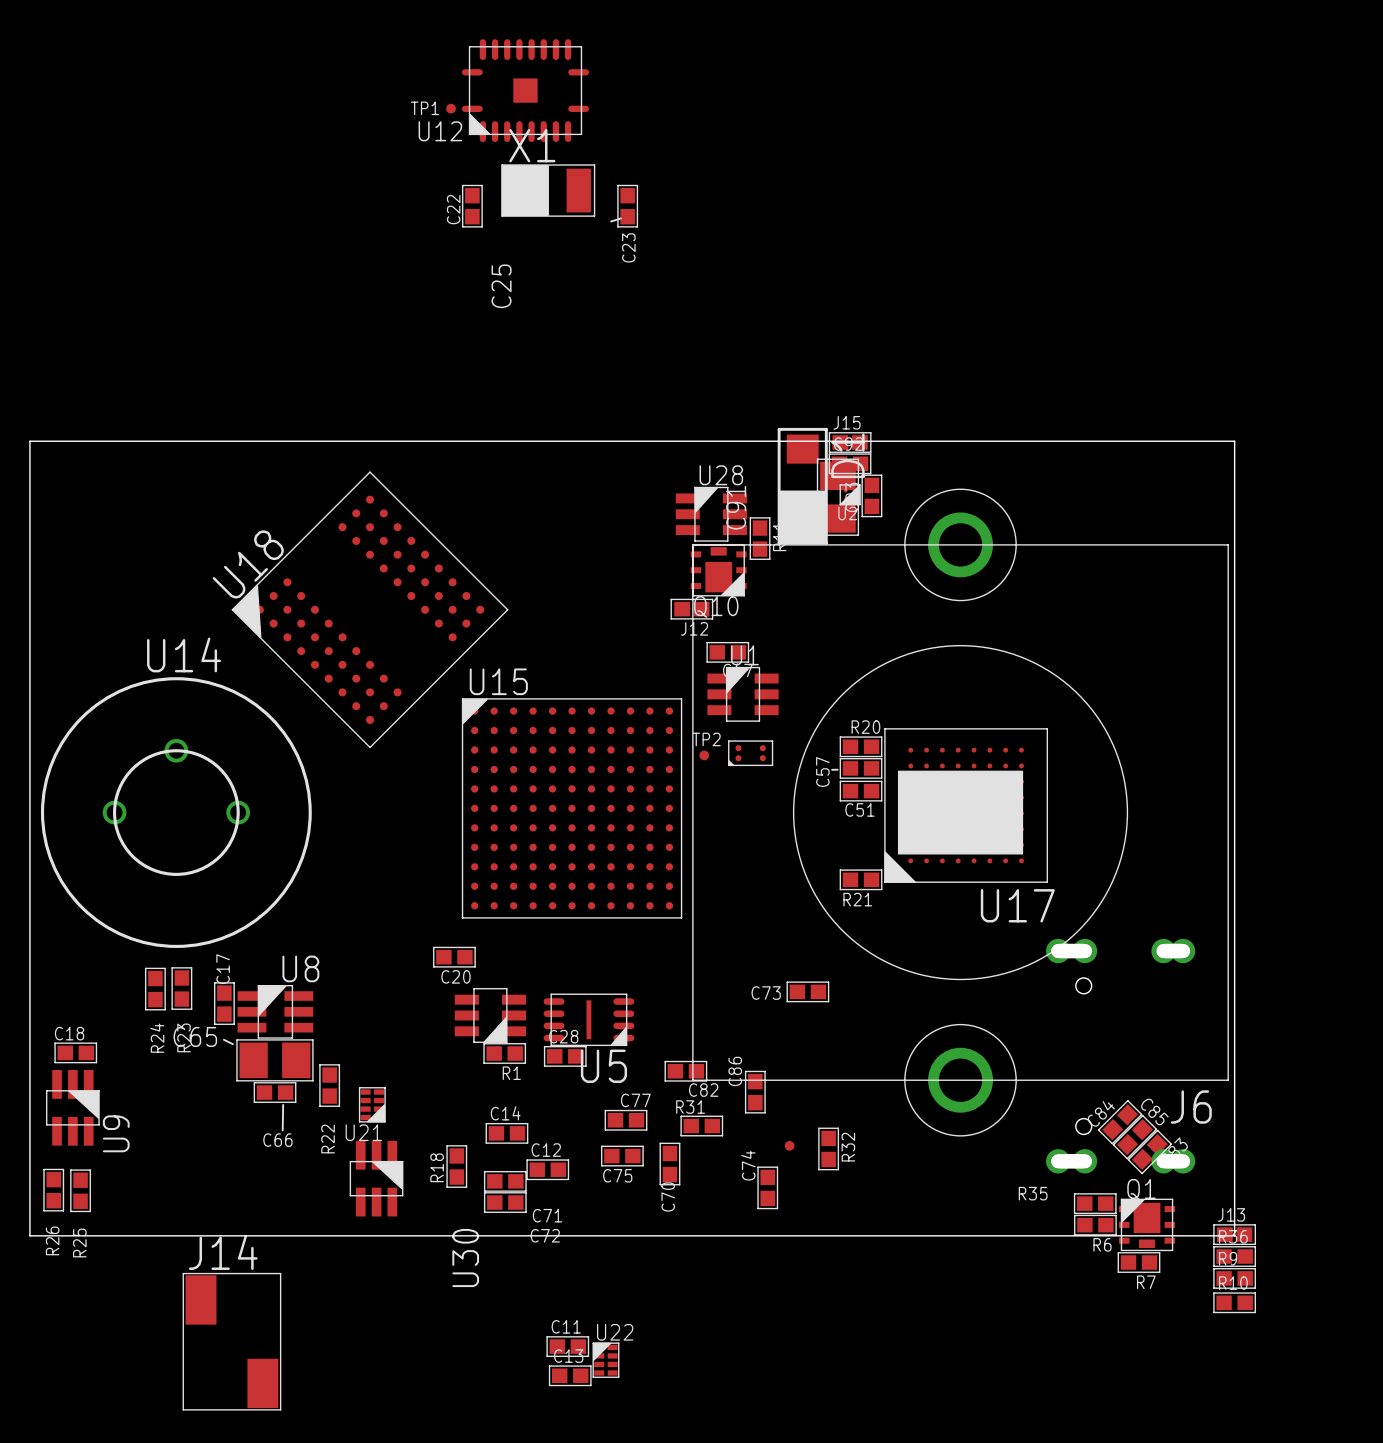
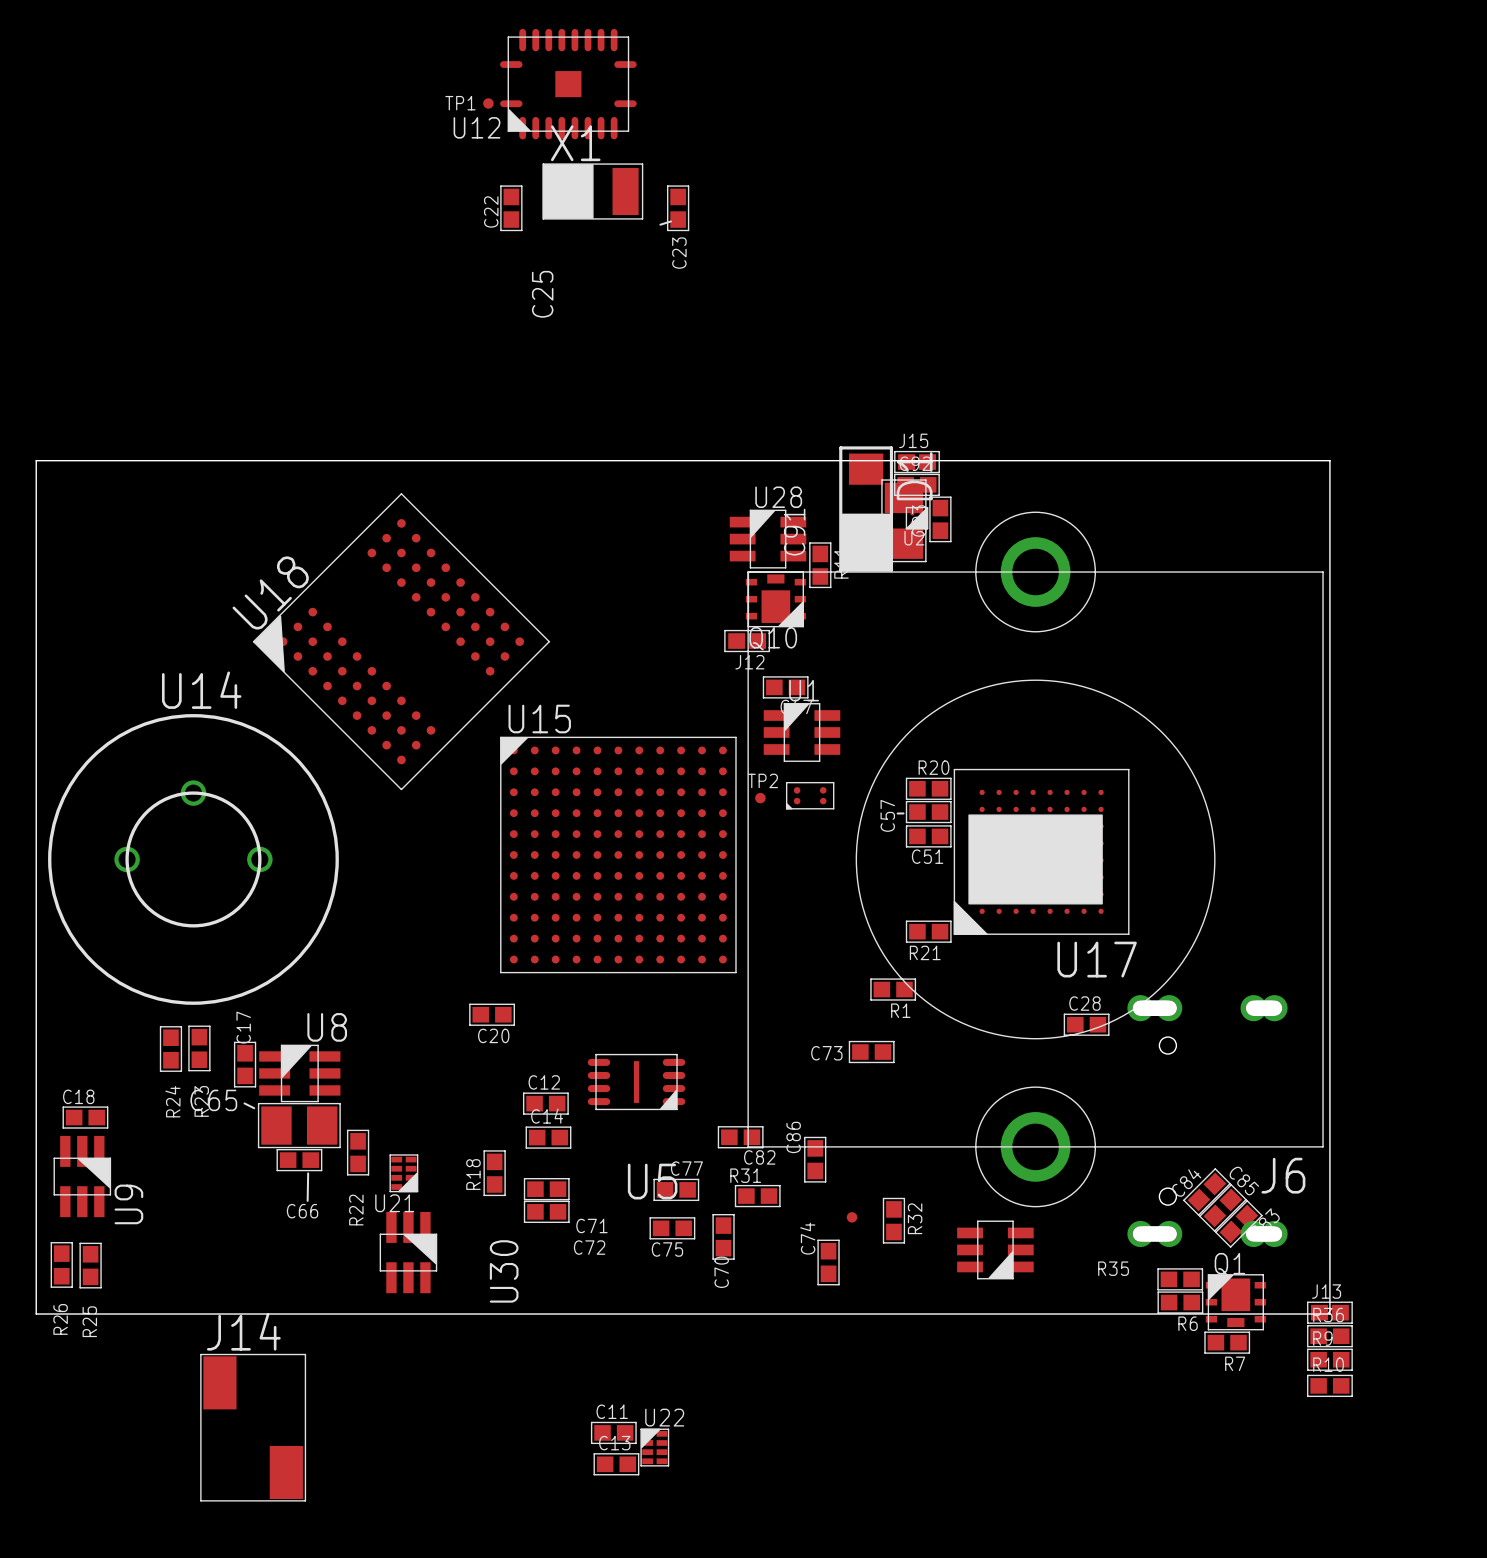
part position: (490, 1015) -> (995, 1249)
R1 position: (504, 1053) -> (893, 989)
C28 position: (565, 1056) -> (1086, 1024)
U5 name position: U5 (603, 1066) -> U5 (652, 1181)
C14 position: (506, 1133) -> (548, 1137)
R18 position: (456, 1166) -> (494, 1173)
C12 position: (547, 1169) -> (545, 1103)
C71 position: (505, 1181) -> (546, 1189)
C72 position: (505, 1202) -> (546, 1211)
U30 name position: U30 (465, 1258) -> U30 (504, 1271)

